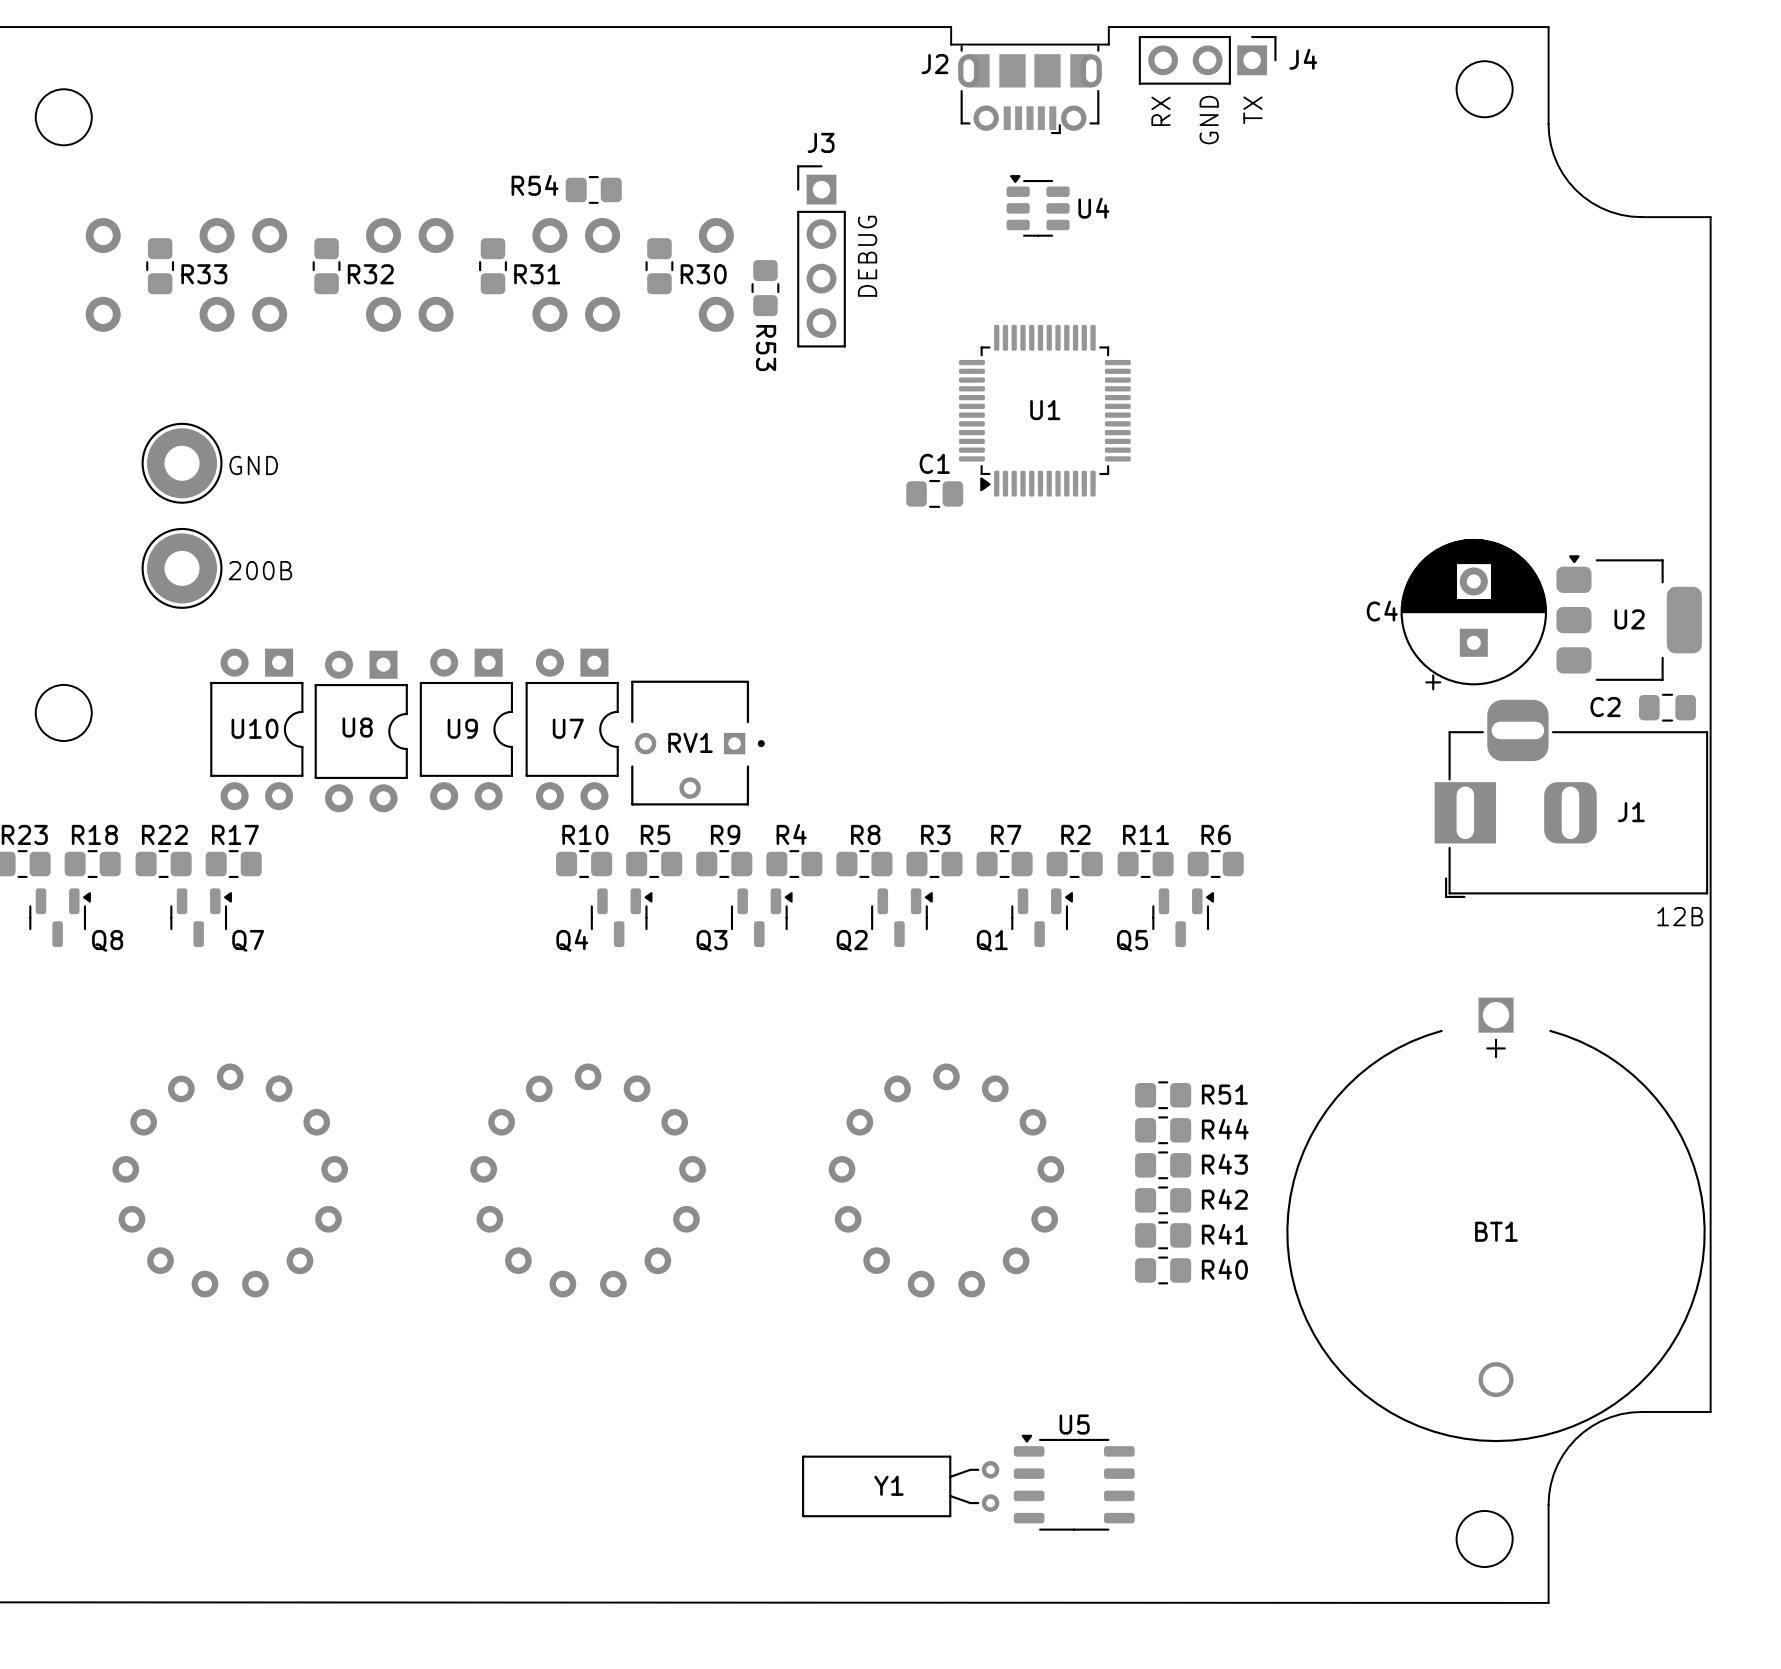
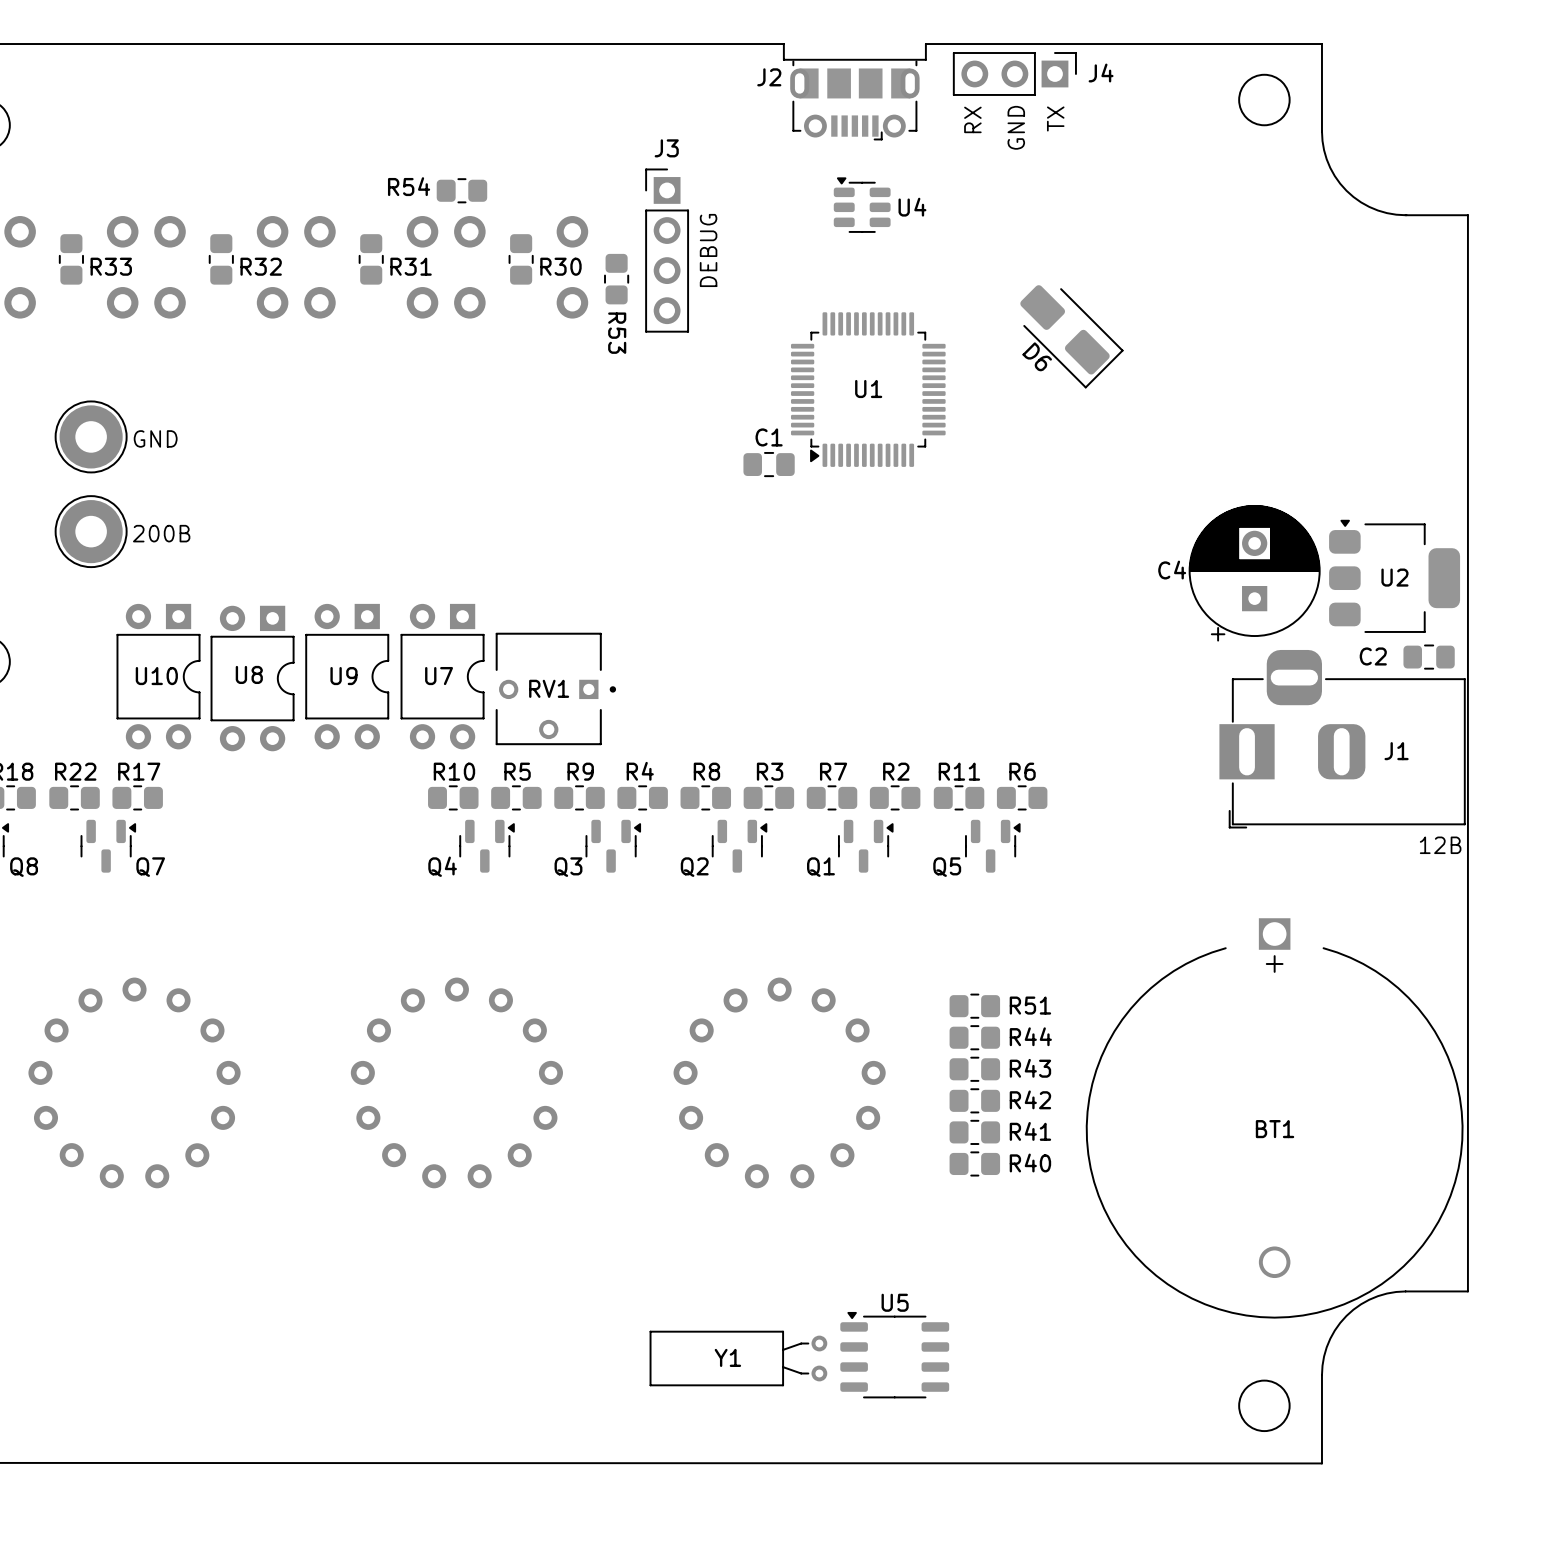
D6: none -> (1071, 336)

